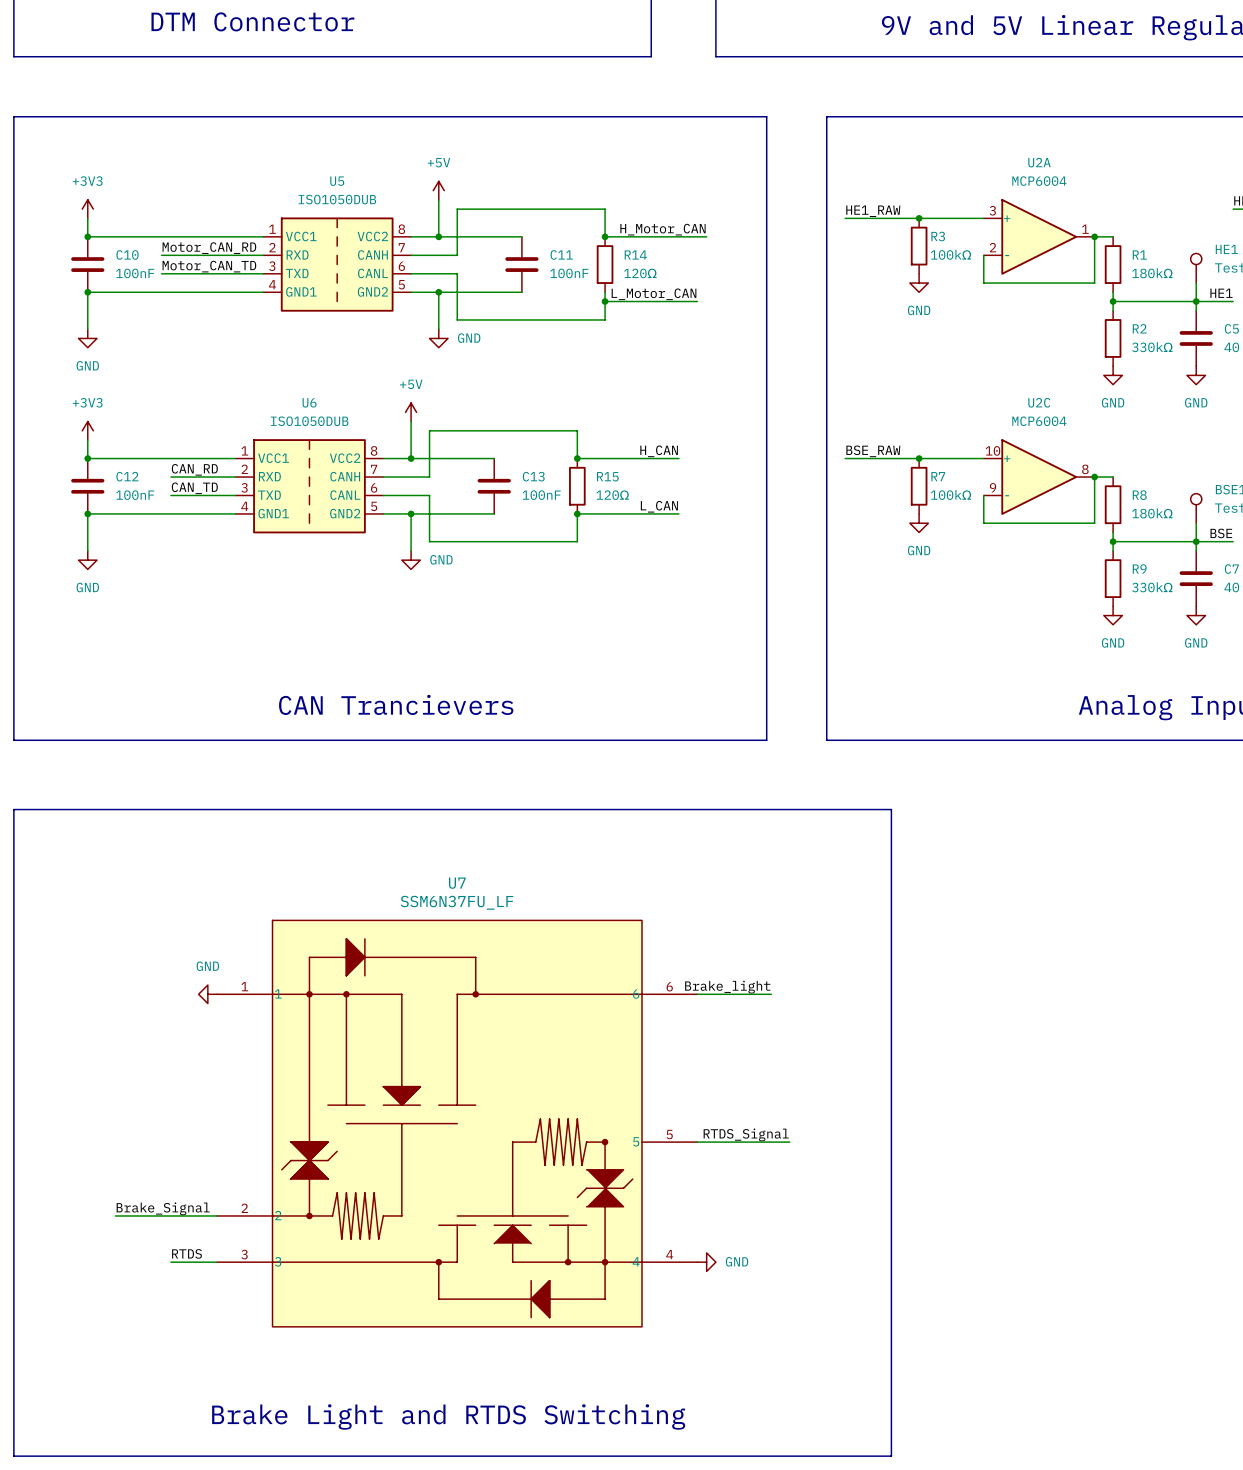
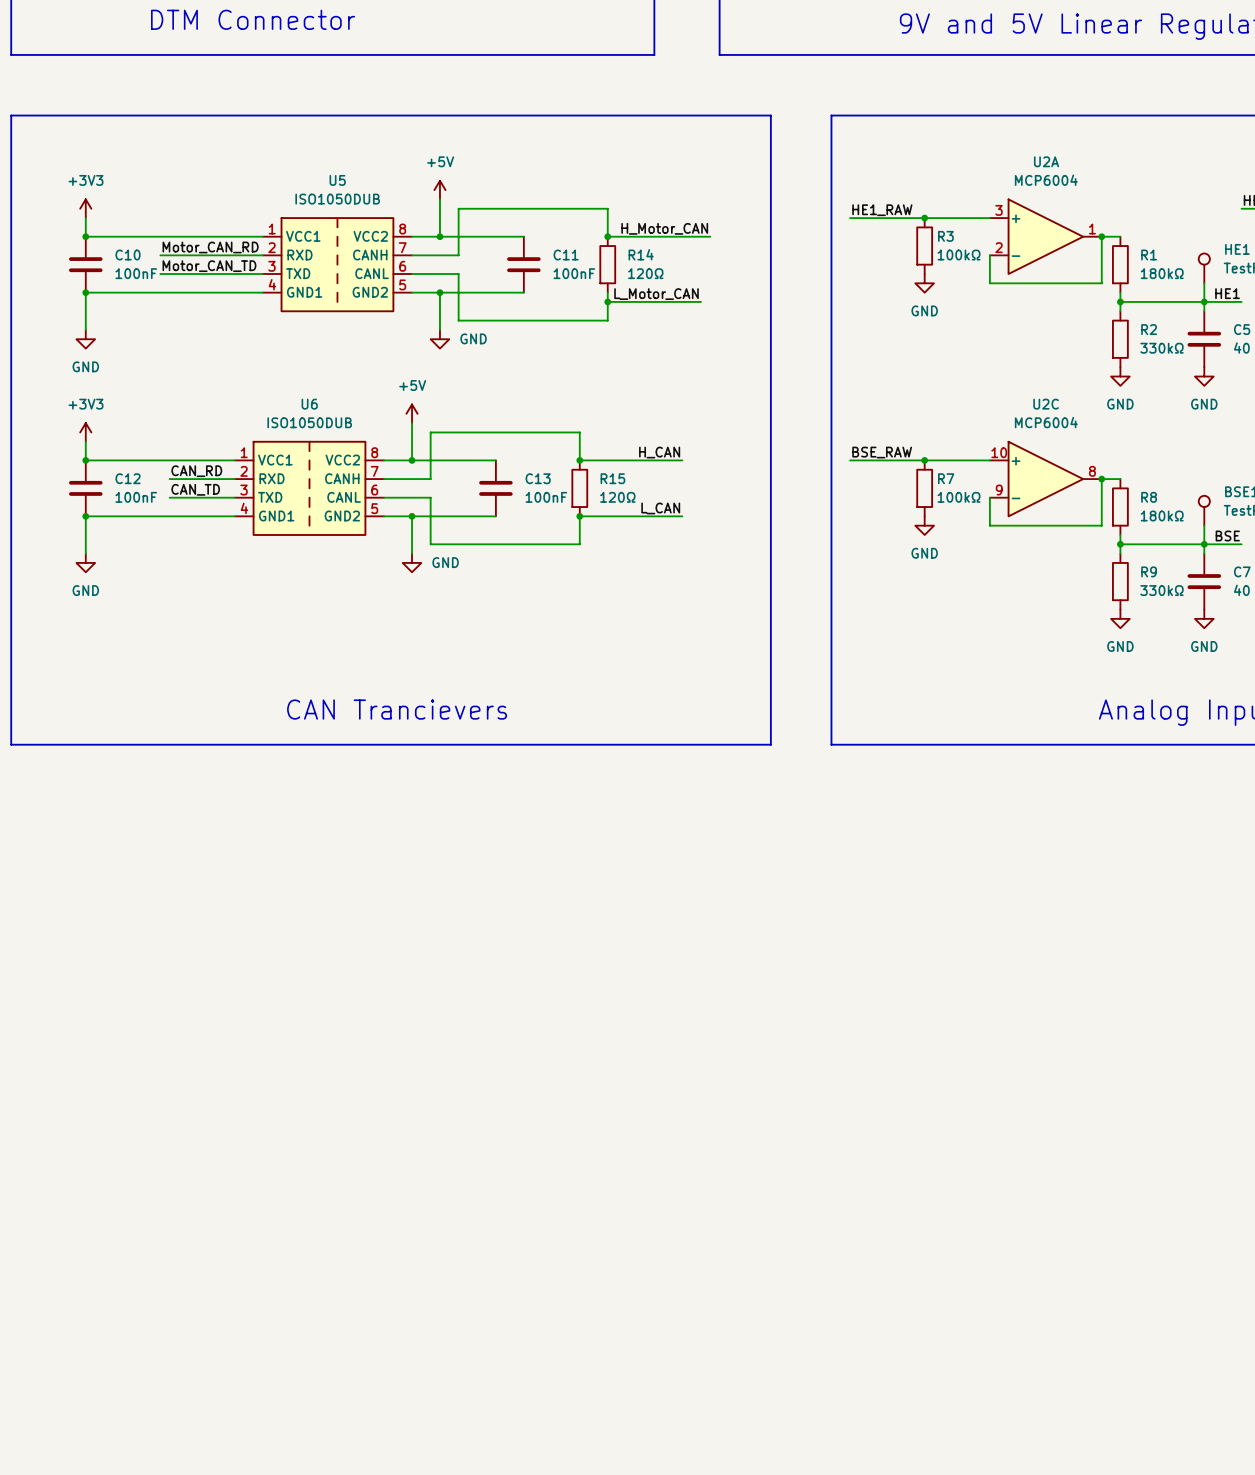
line: (13, 809) (891, 809) (891, 1456) (13, 1456) (13, 809) -> none
label: Brake_light (727, 987) -> none
power symbol: GND (207, 994) -> none
wire: (697, 994) (771, 994) -> none
U7: SSM6N37FU_LF (457, 1123) -> none
label: RTDS_Signal (746, 1134) -> none
wire: (697, 1142) (789, 1142) -> none
label: Brake_Signal (163, 1208) -> none
wire: (115, 1215) (217, 1215) -> none
label: RTDS (187, 1253) -> none
wire: (170, 1262) (217, 1262) -> none
power symbol: GND (706, 1262) -> none
text: Brake Light and RTDS Switching (448, 1416) -> none

